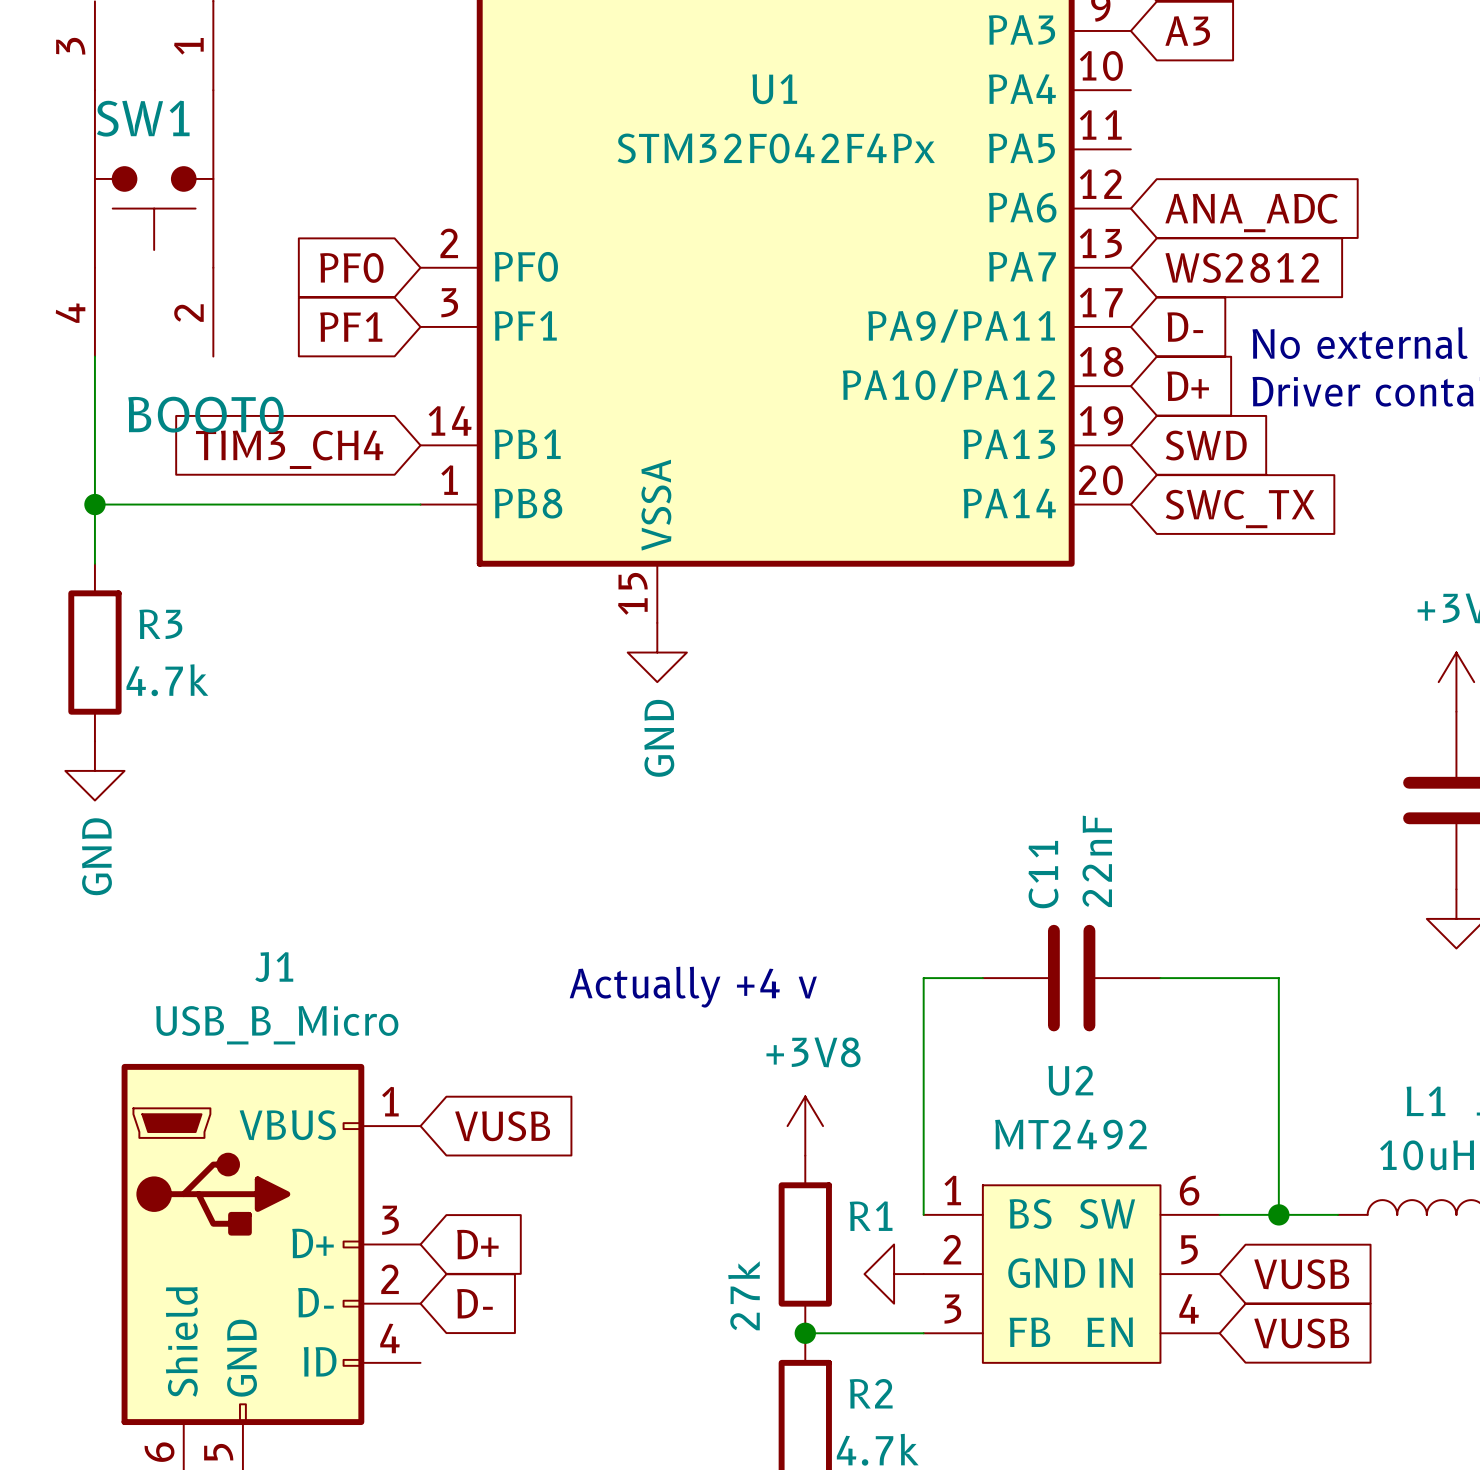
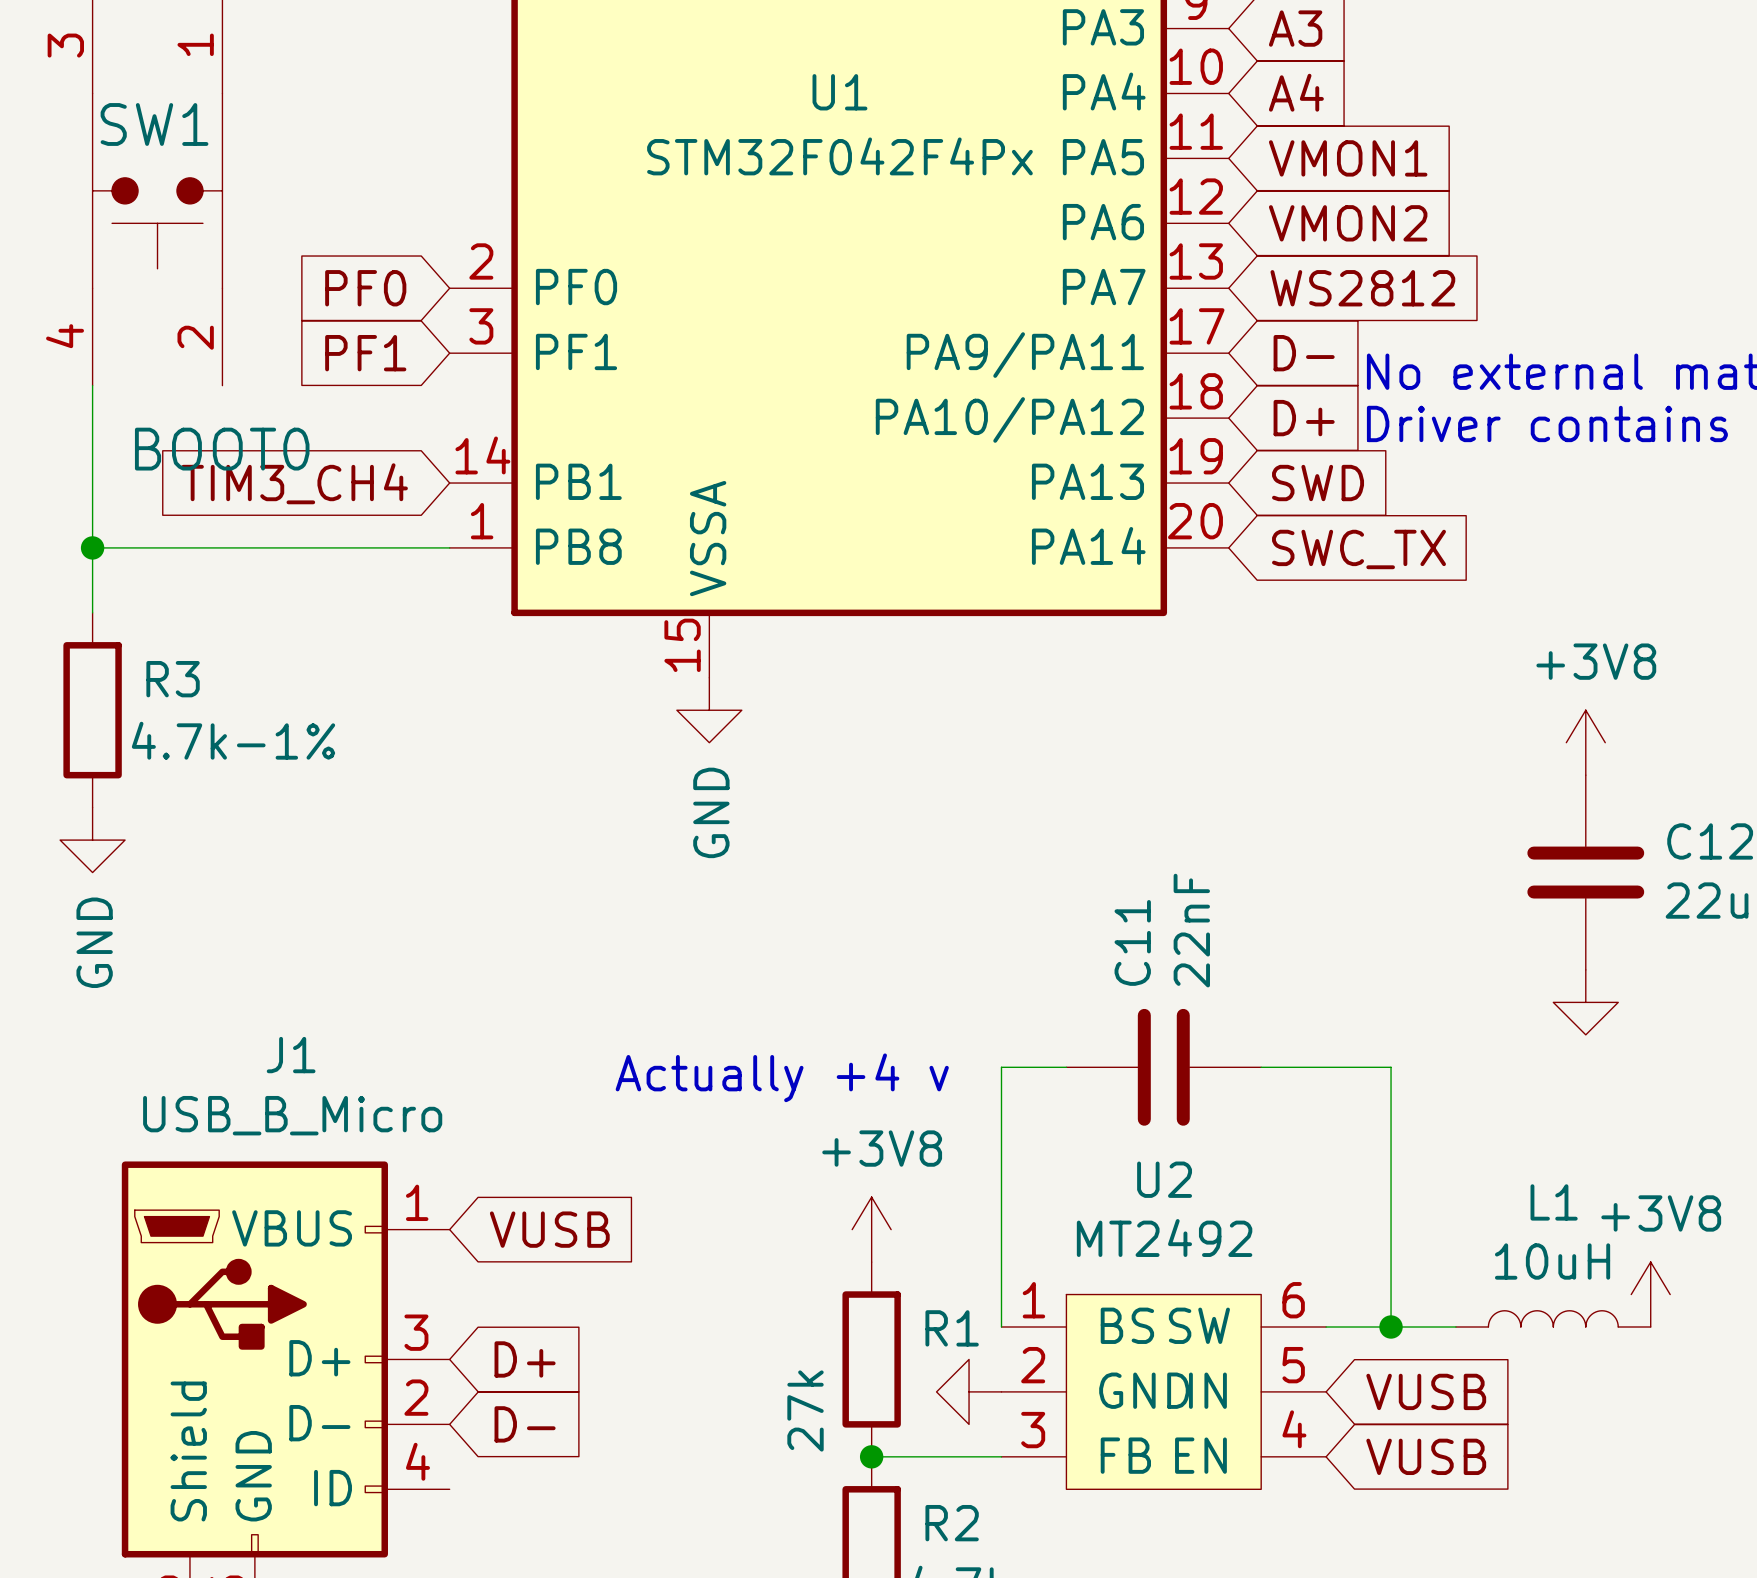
global label: none -> A4 (1296, 92)
global label: none -> VMON1 (1348, 158)
global label: ANA_ADC (1251, 213) -> VMON2 (1348, 223)
R3 value: 4.7k (167, 680) -> 4.7k-1% (233, 740)

